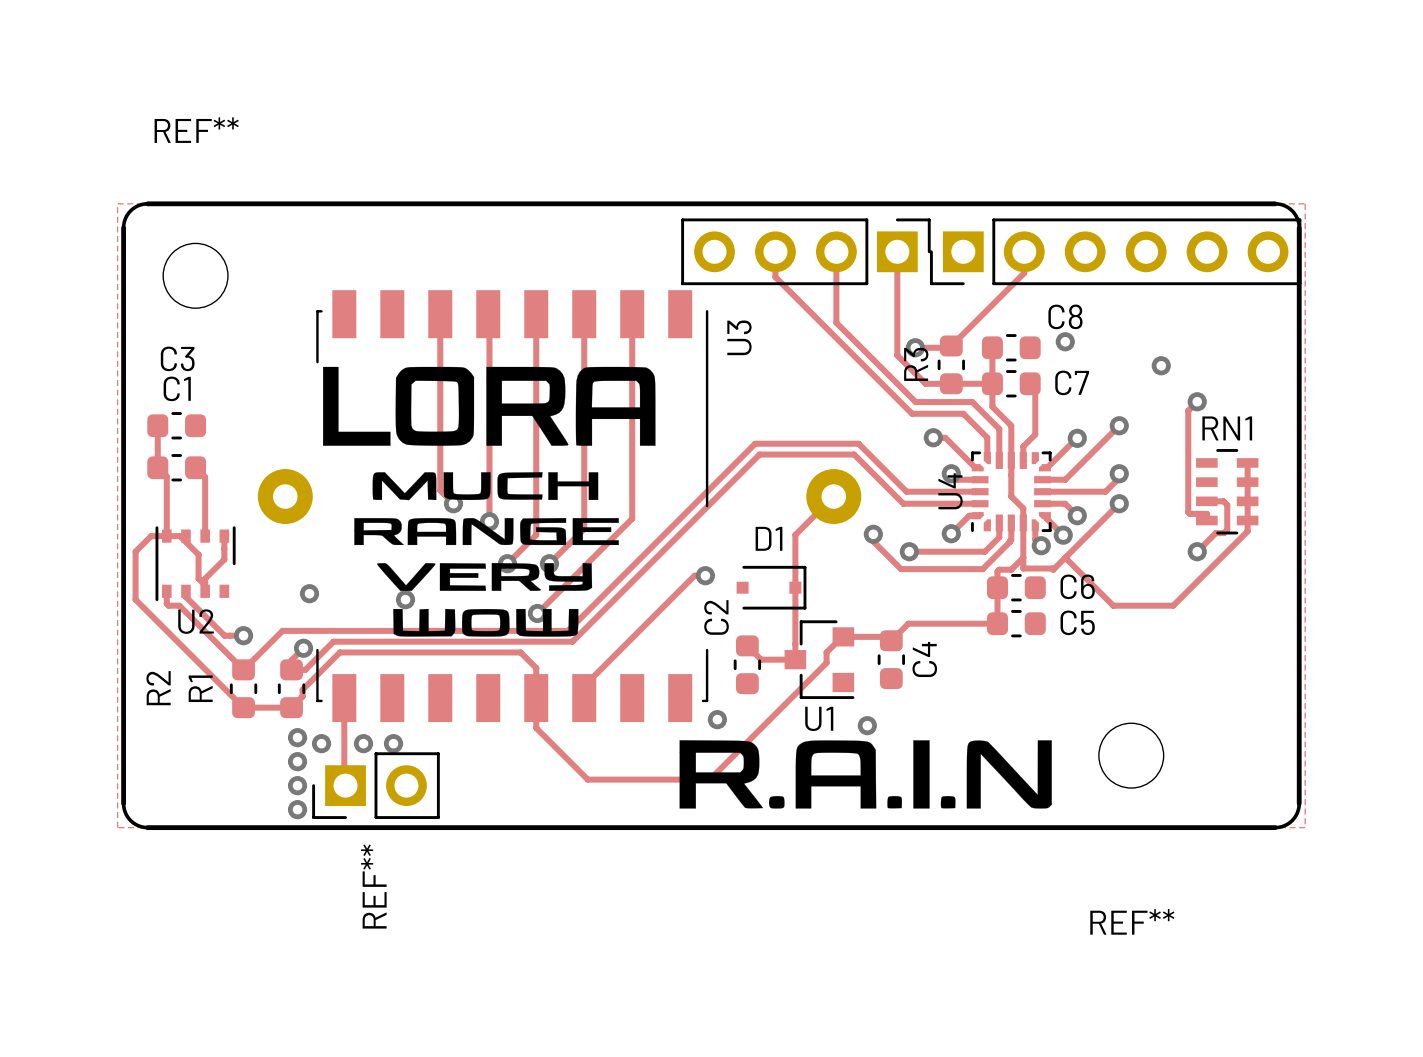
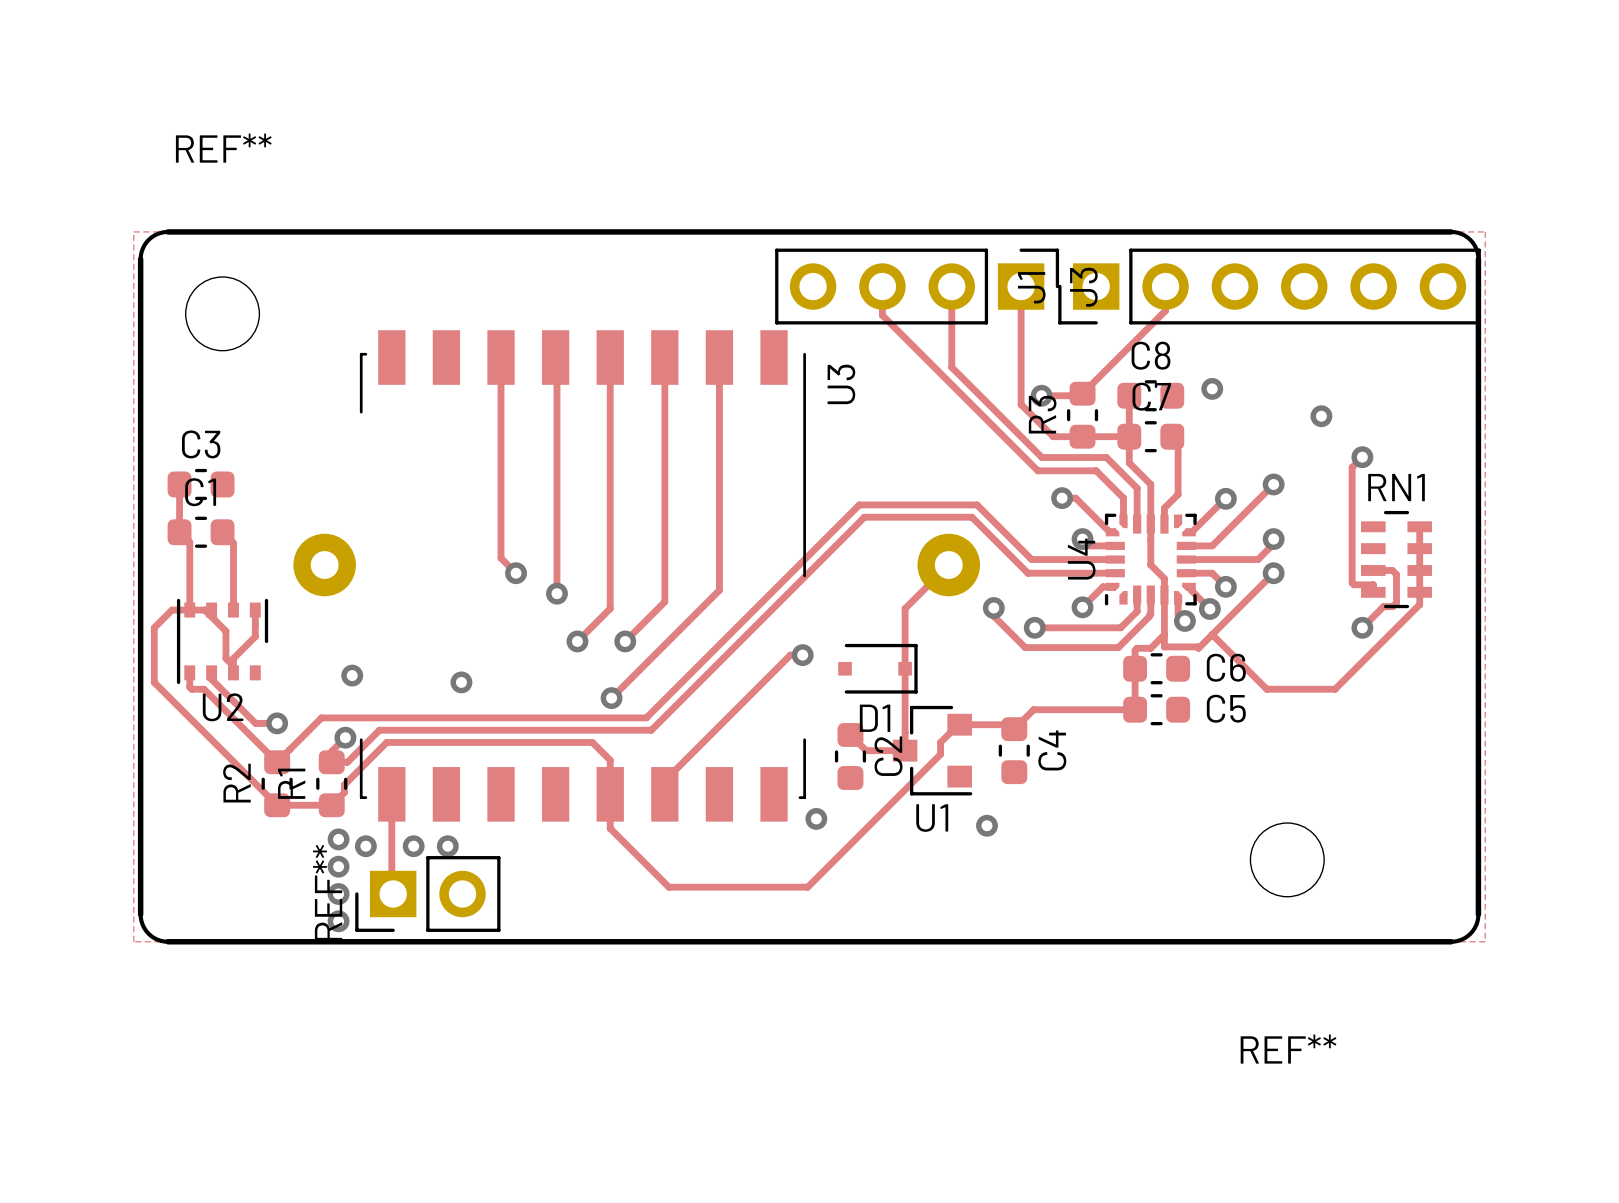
J1 name: none -> J1 (1031, 287)
J3 name: none -> J3 (1083, 287)
C8 name position: C8 (1065, 316) -> C8 (1151, 355)
C3 name position: C3 (177, 358) -> C3 (201, 444)
drawing: [323, 366, 1052, 809] -> none
C7 name position: C7 (1072, 382) -> C7 (1151, 396)
C1 name position: C1 (177, 388) -> C1 (200, 492)
D1 name position: D1 (769, 538) -> D1 (875, 718)
C2 name position: C2 (716, 617) -> C2 (888, 756)
R2 name position: R2 (158, 688) -> R2 (236, 783)
R1 name position: R1 (200, 688) -> R1 (291, 783)
REF** name position: REF** (373, 886) -> REF** (327, 892)

